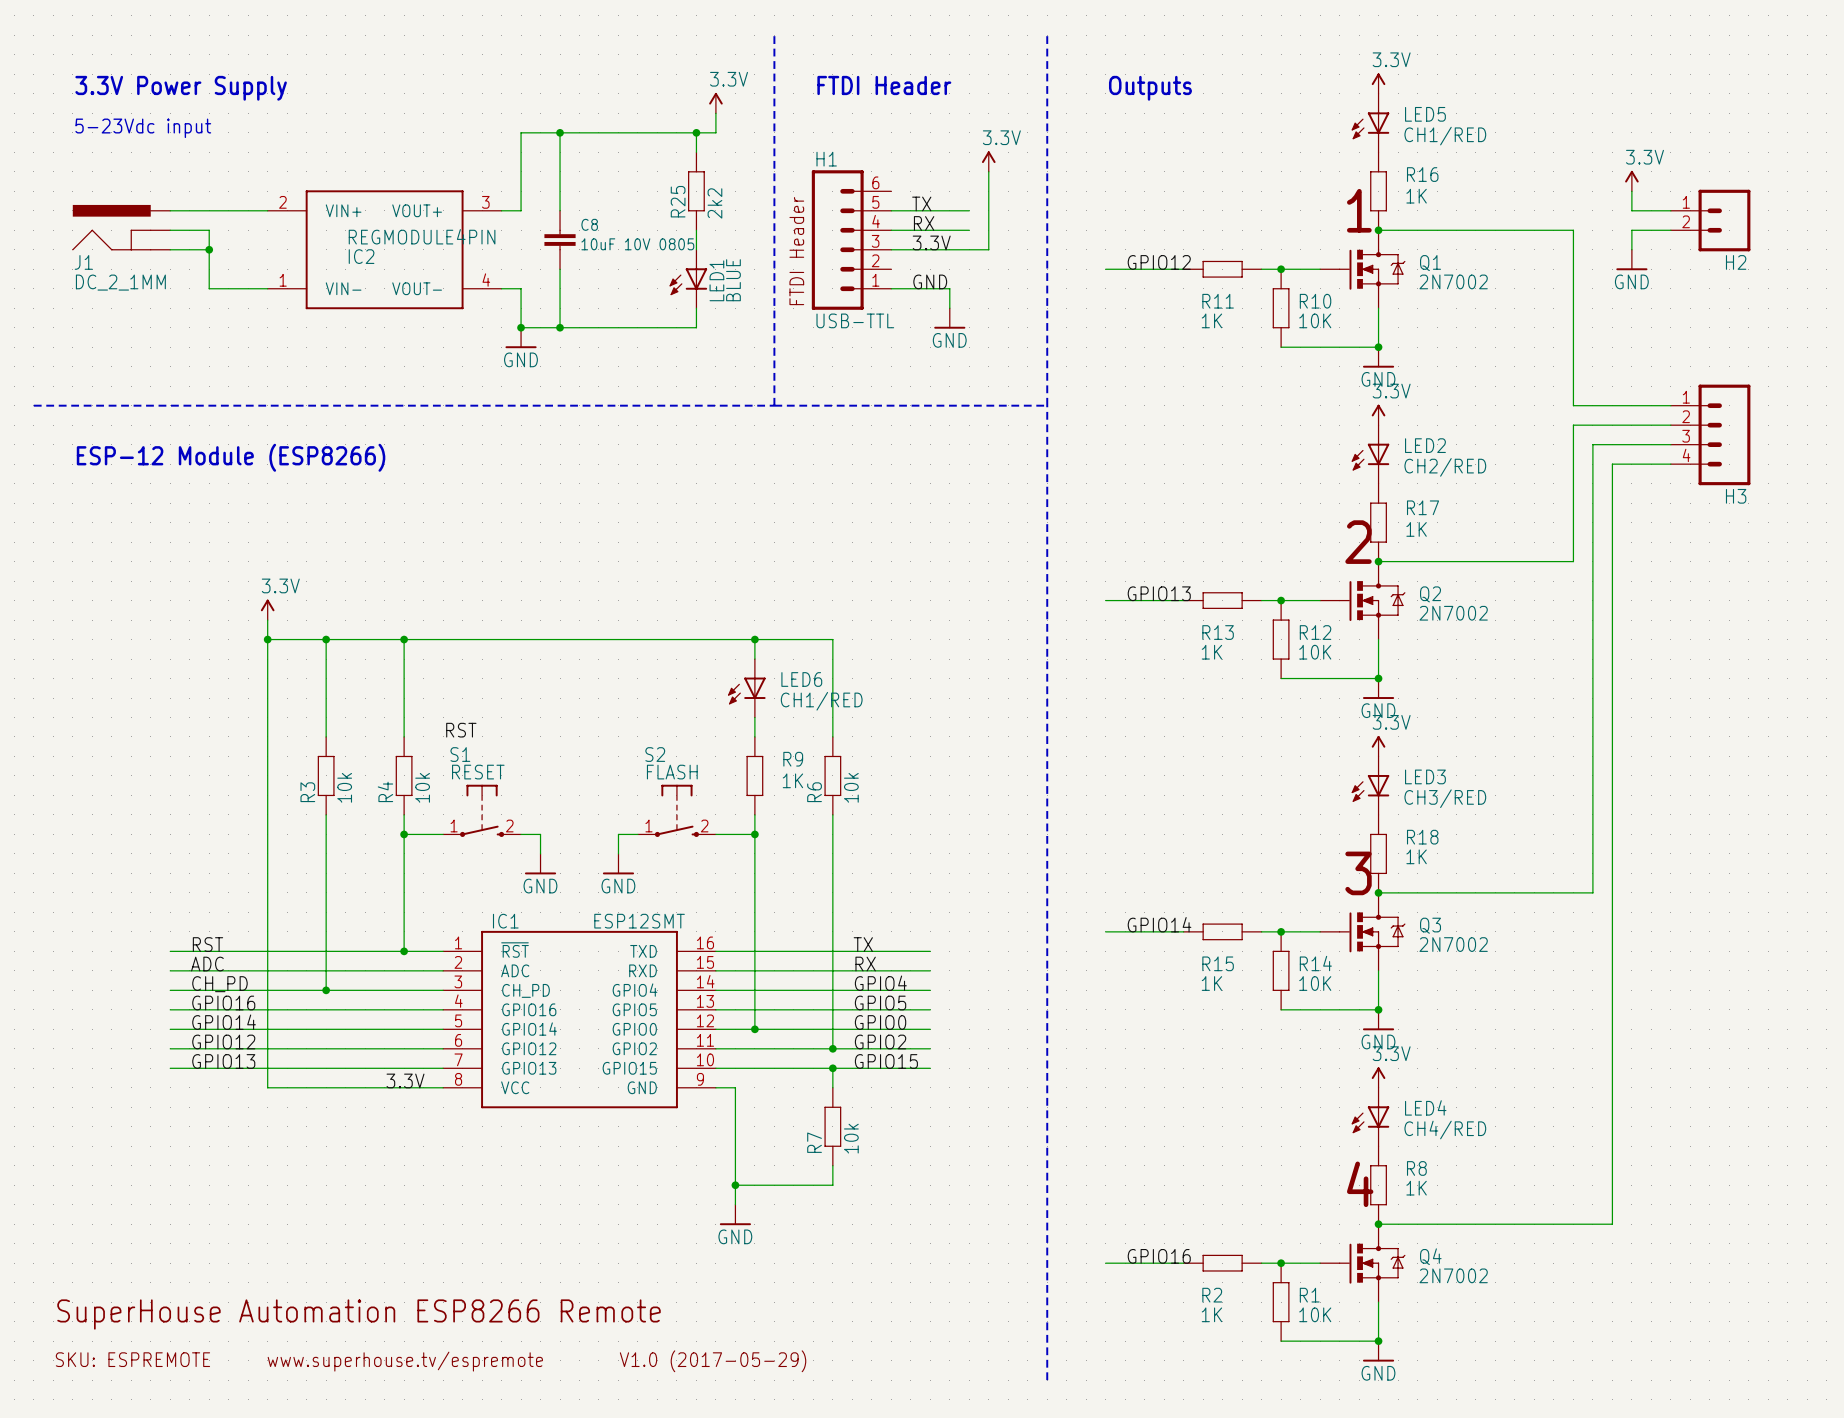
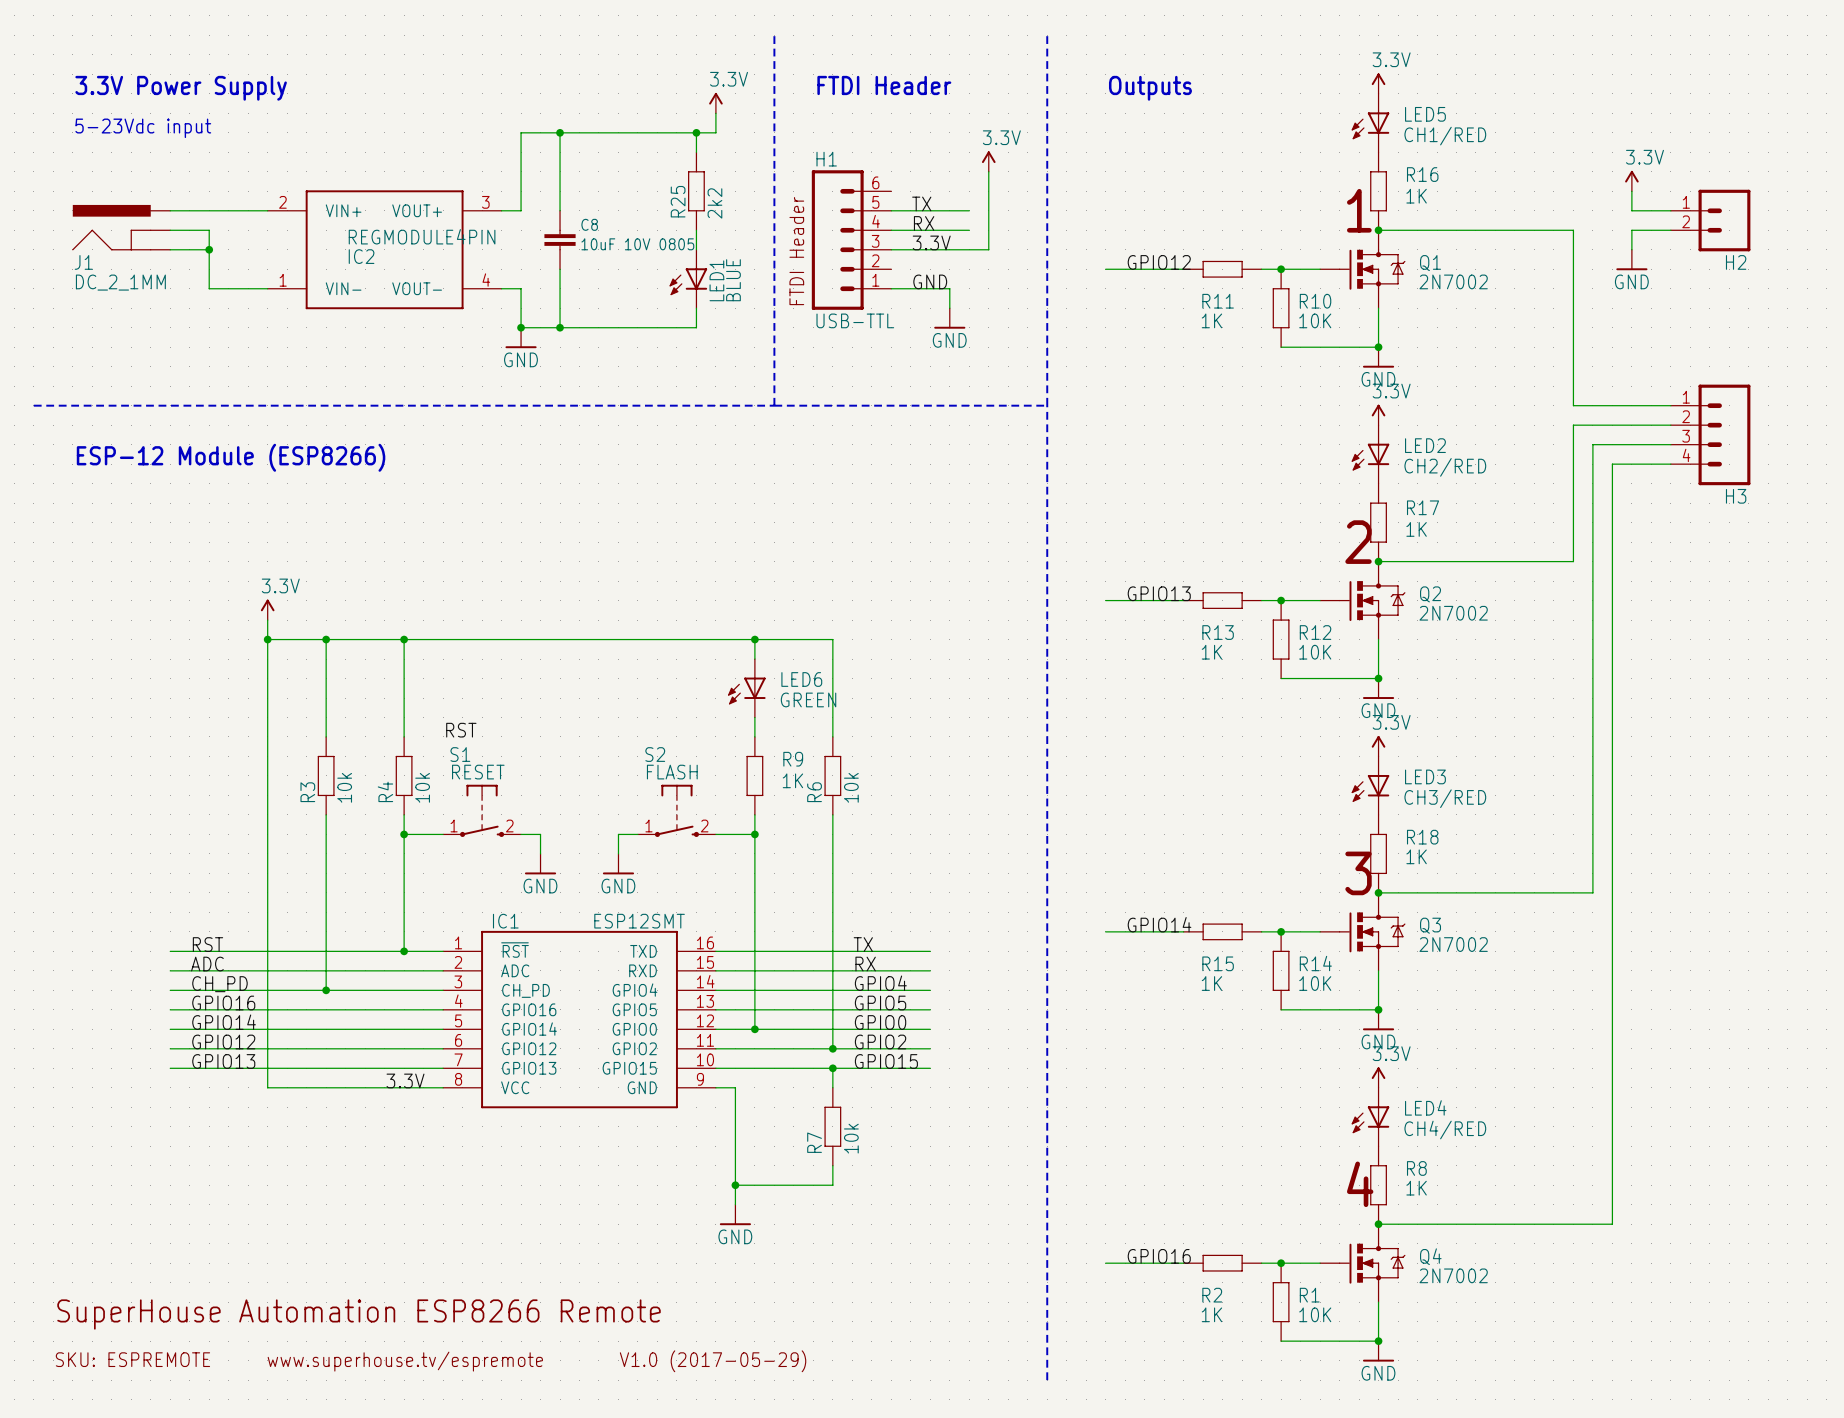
LED6 value: CH1/RED (821, 701) -> GREEN (808, 699)

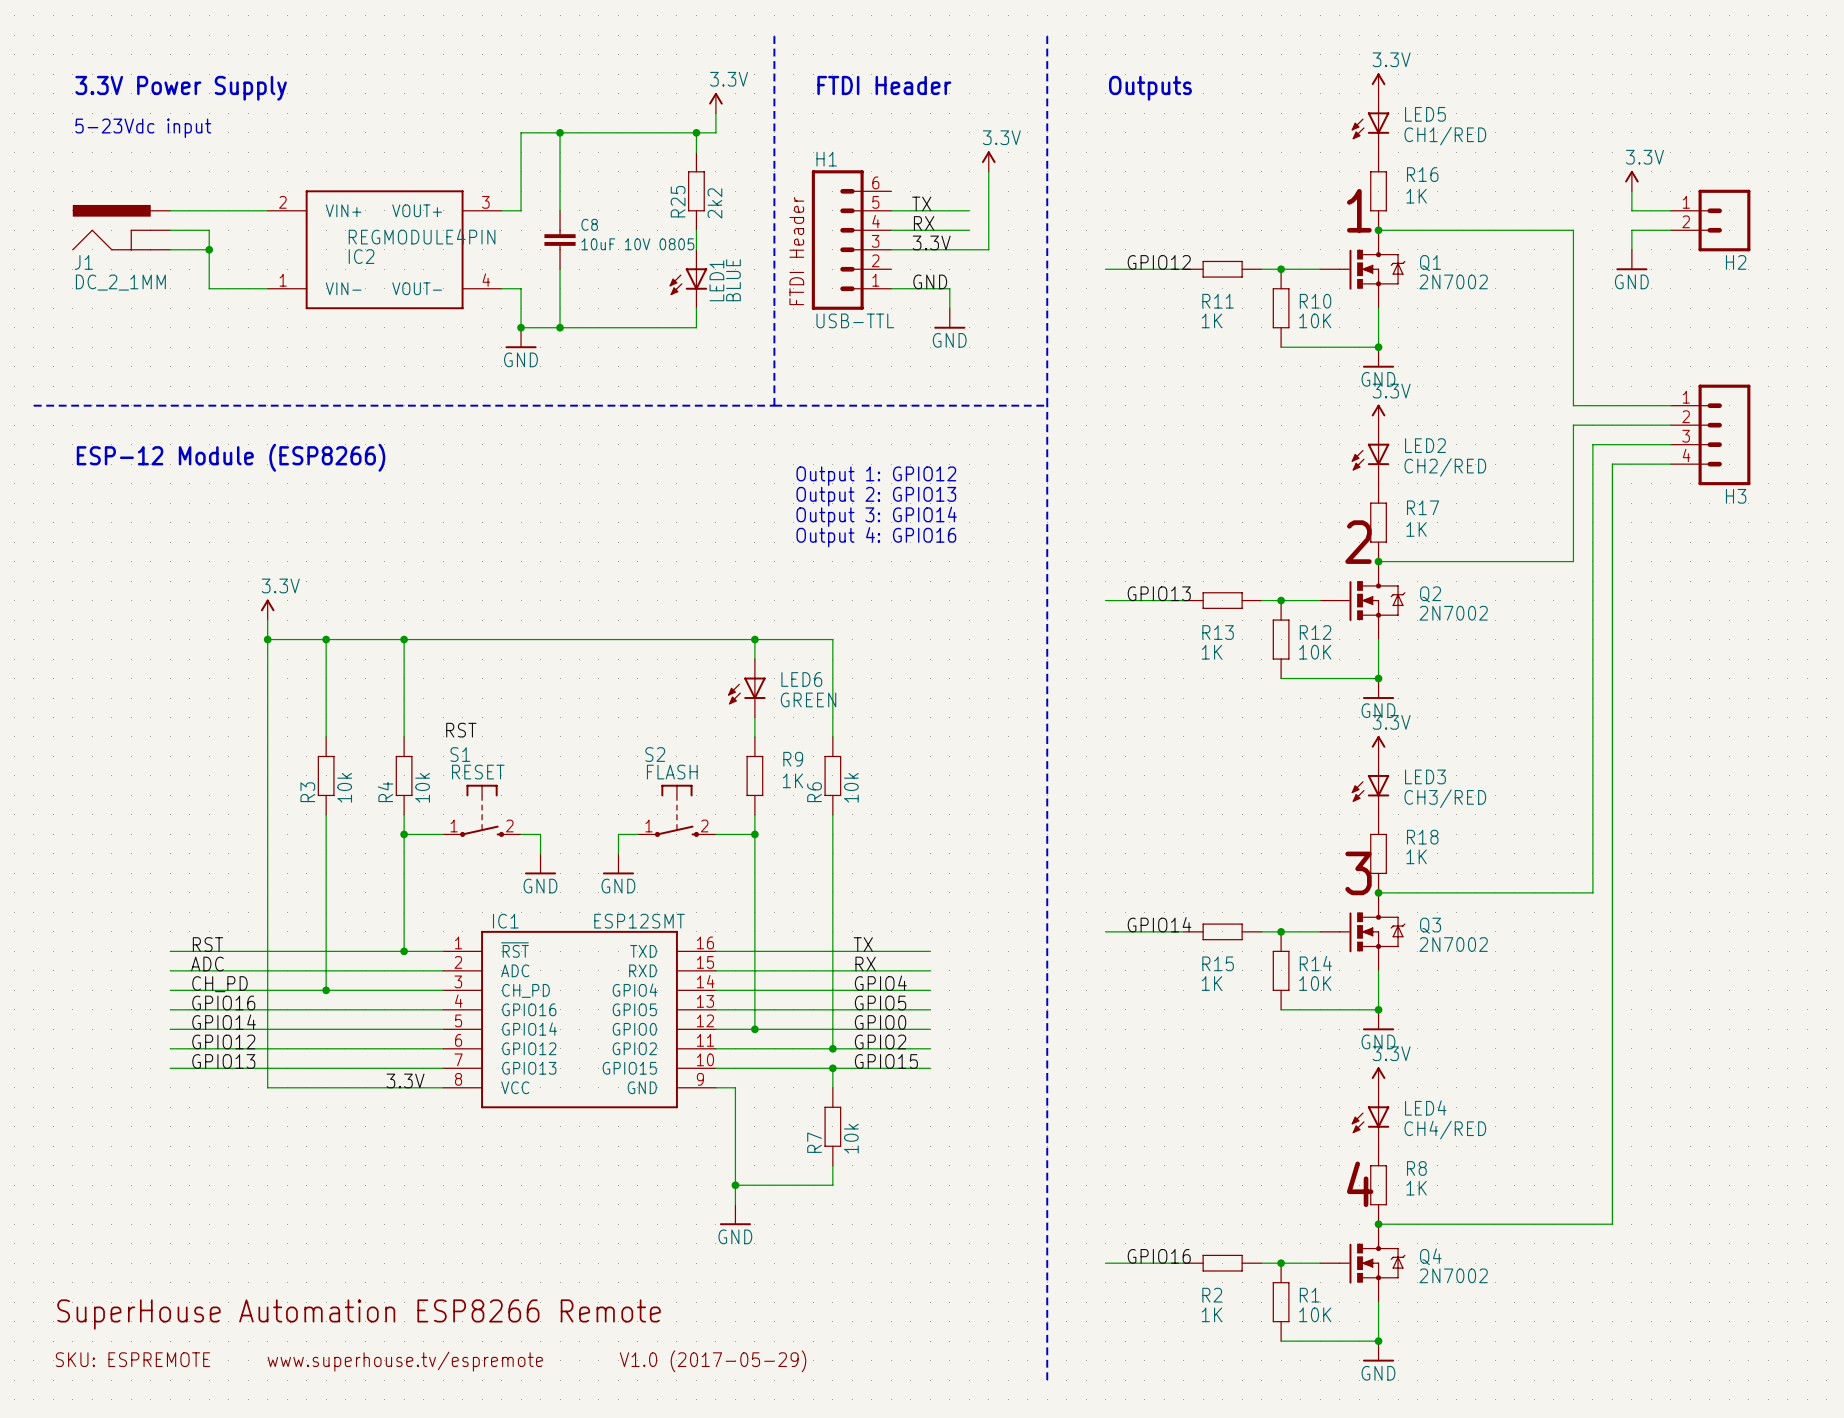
text: none -> Output 1: GPIO12 (876, 476)
text: none -> Output 2: GPIO13 (876, 496)
text: none -> Output 3: GPIO14 (876, 516)
text: none -> Output 4: GPIO16 (876, 537)

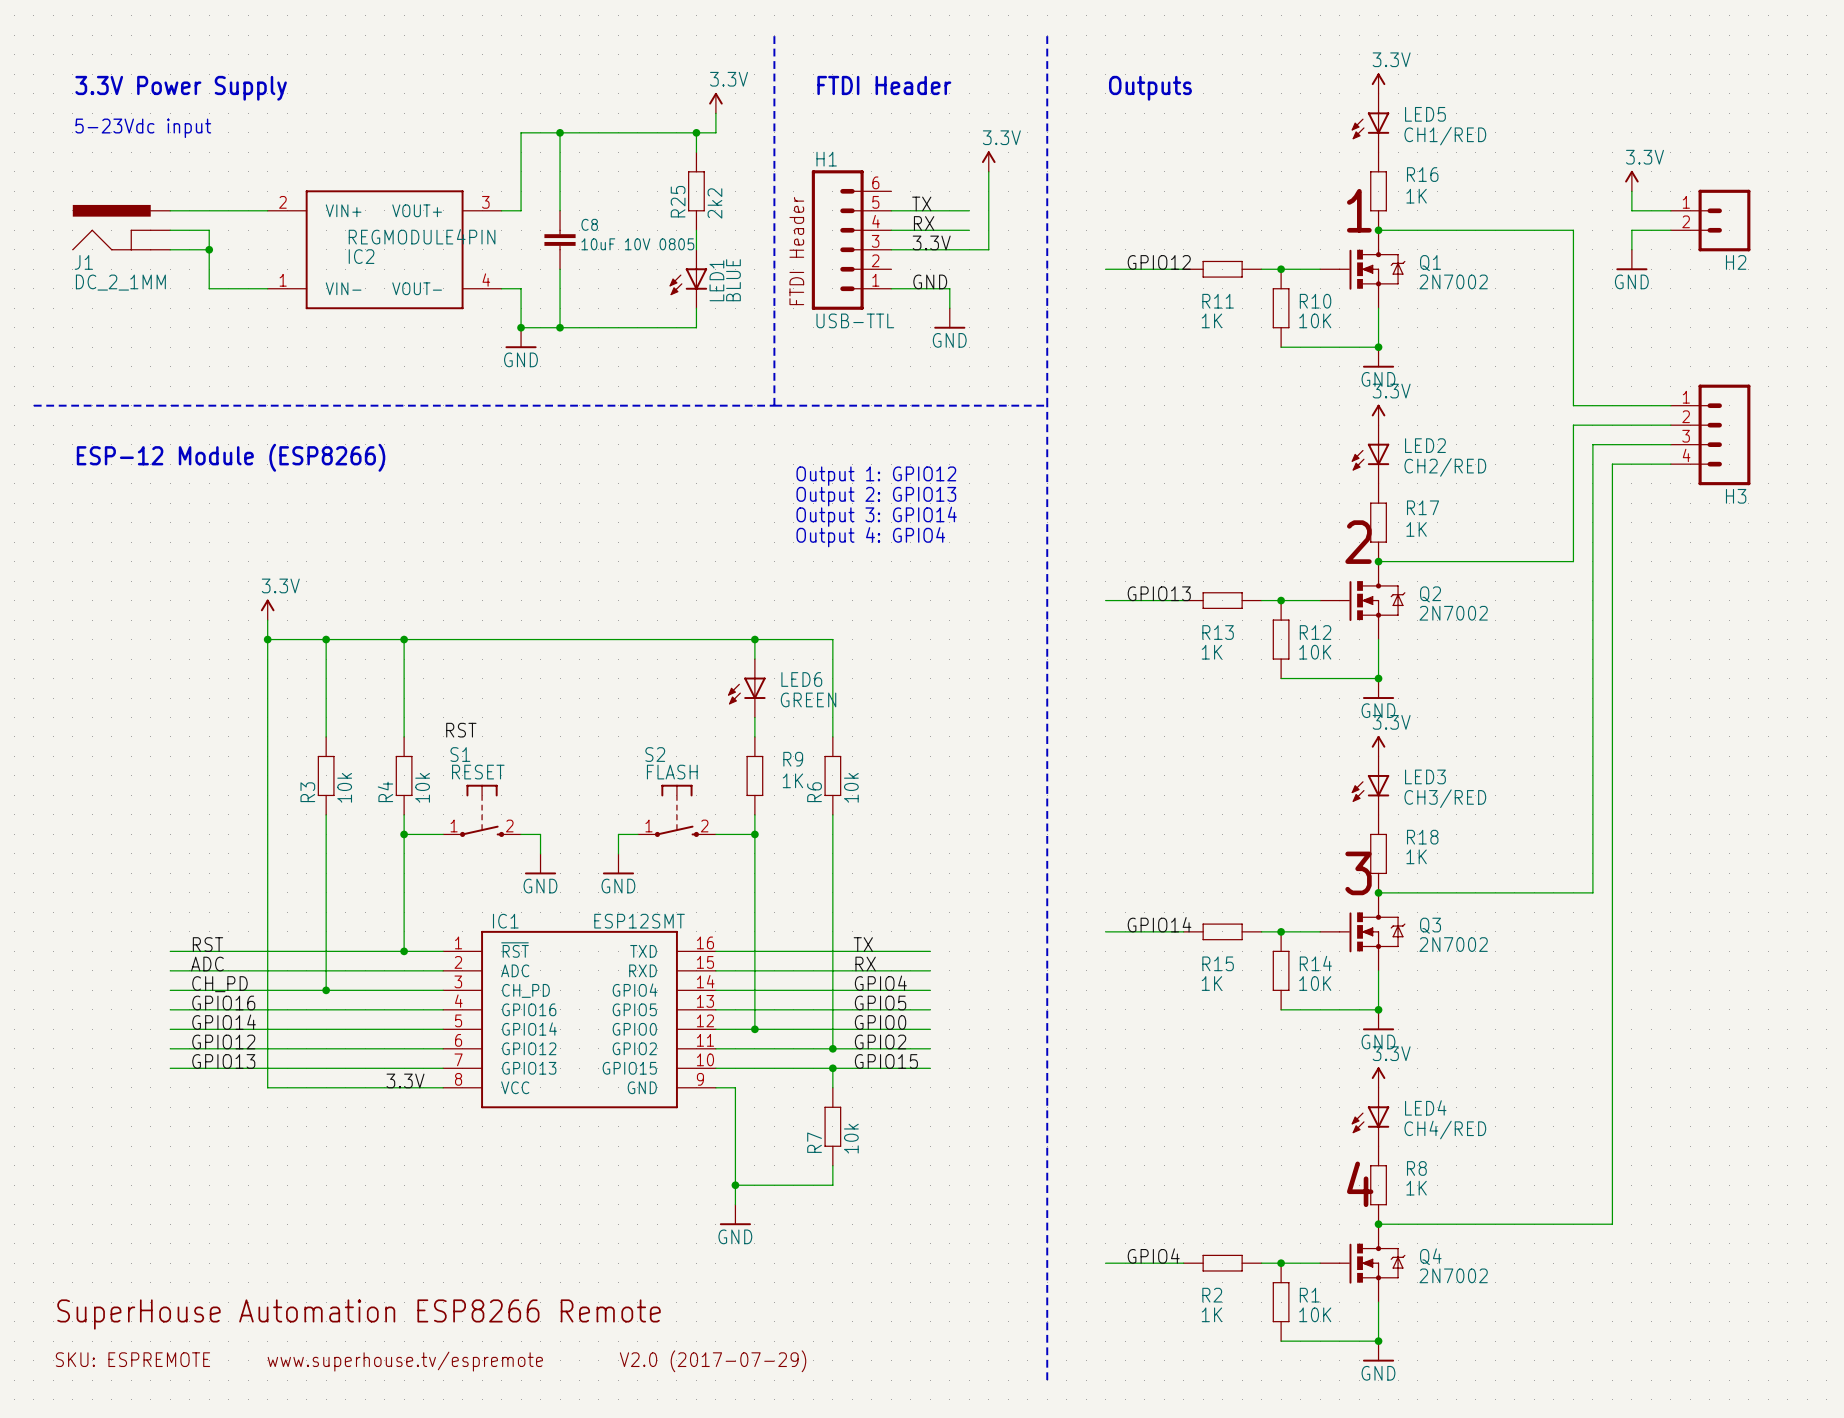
text: Output 4: GPIO16 (876, 537) -> Output 4: GPIO4 (870, 537)
label: GPIO16 (1159, 1256) -> GPIO4 (1153, 1256)
text: V1.0 (2017-05-29) (713, 1361) -> V2.0 (2017-07-29) (713, 1361)

